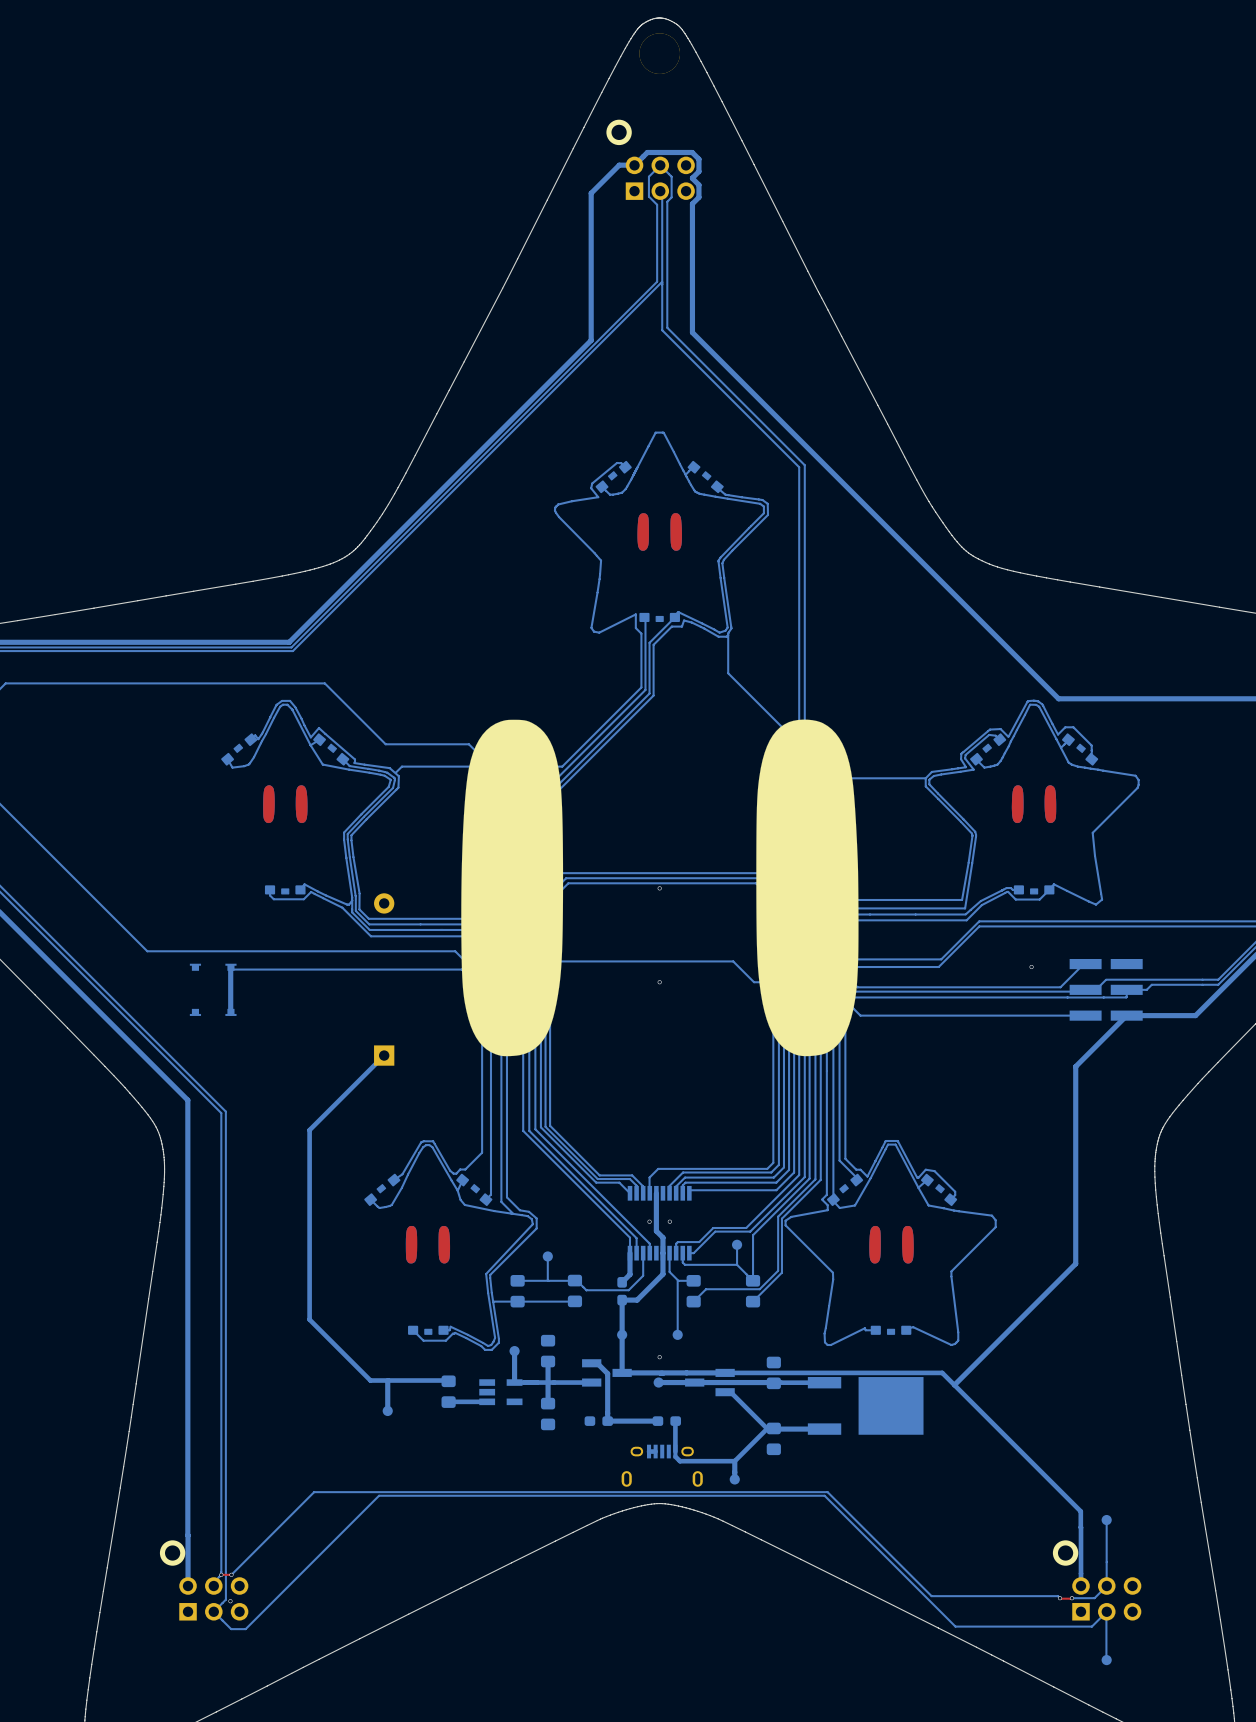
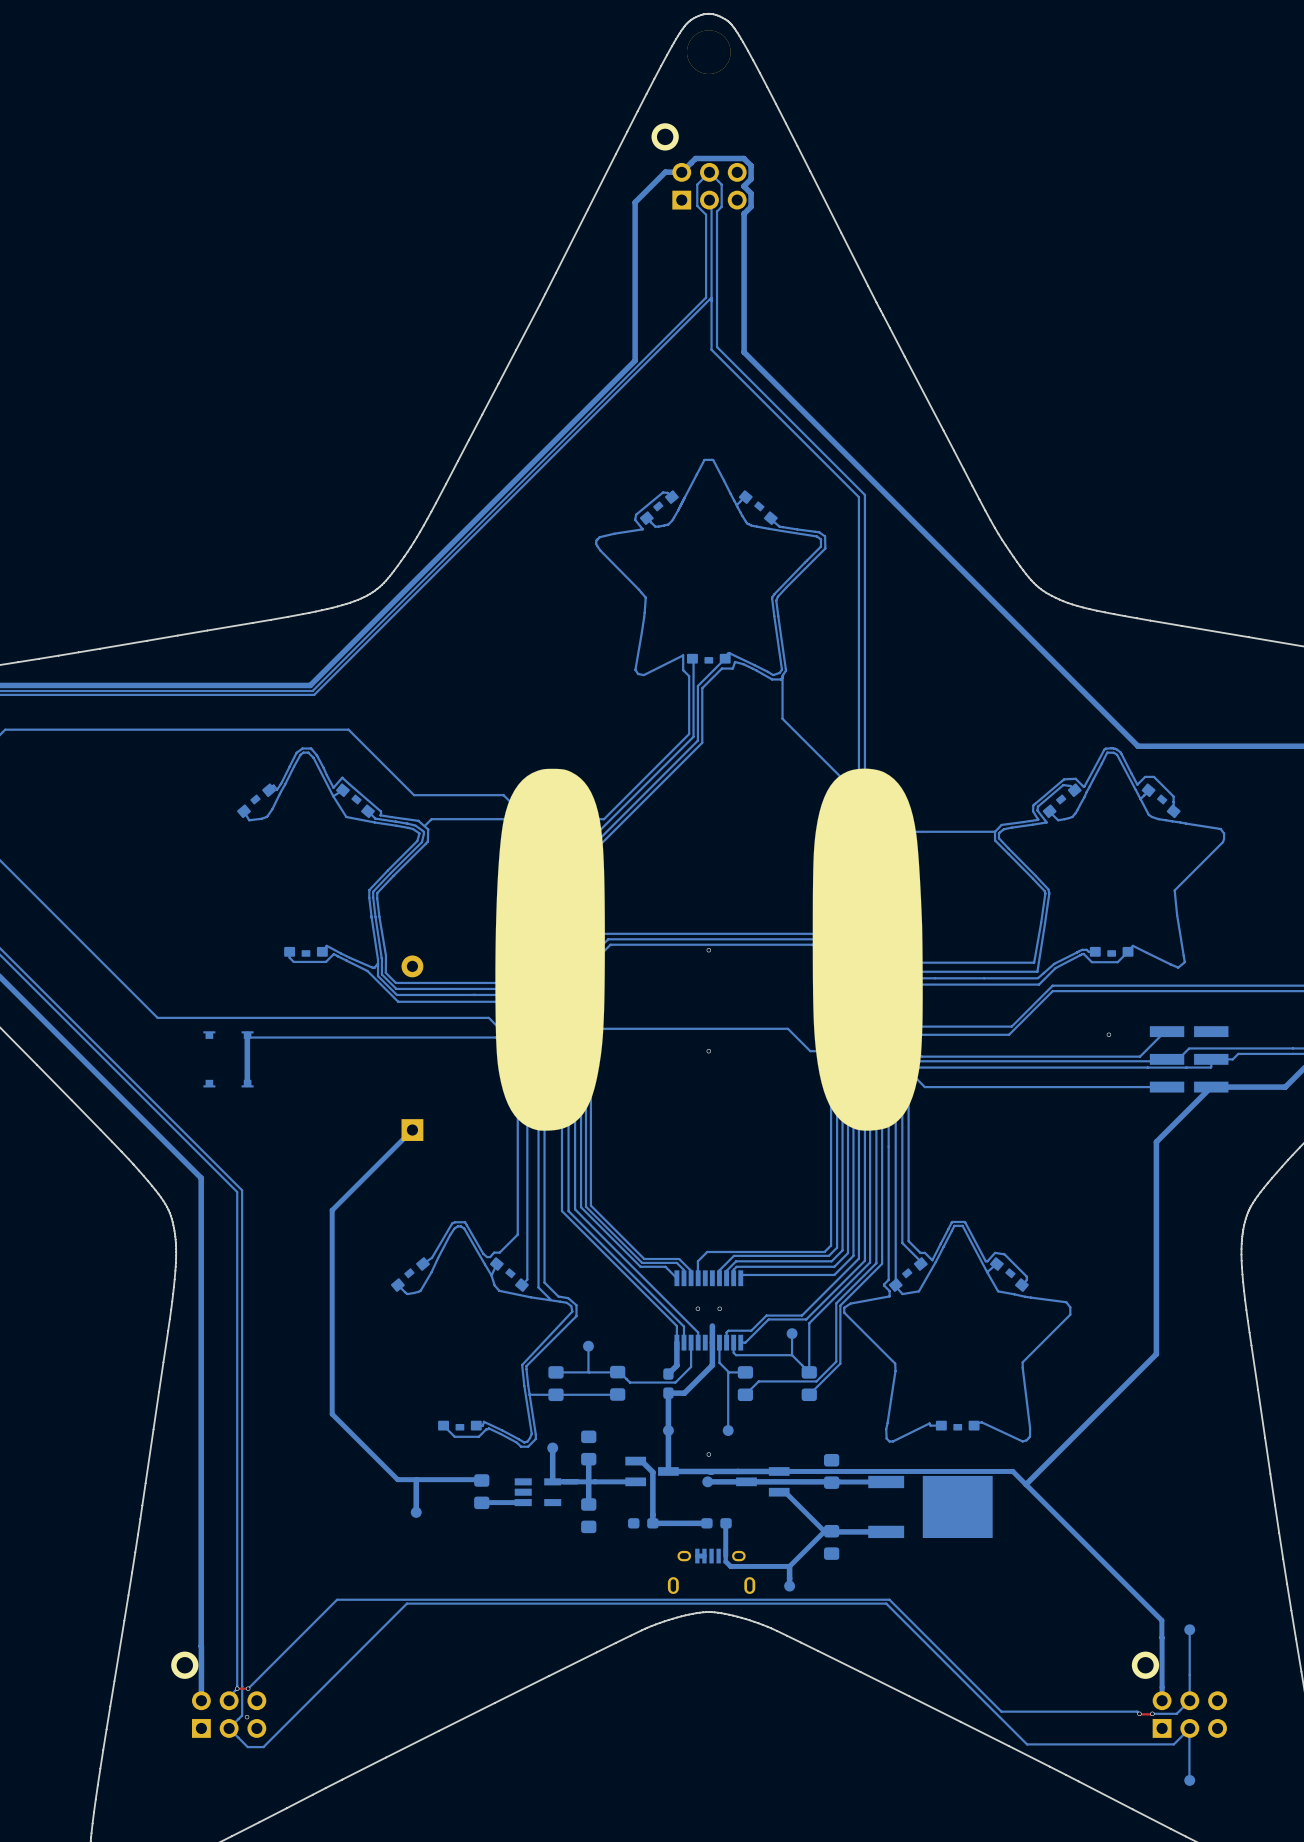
drawing: [263, 513, 1057, 1264] -> none
bottom track: (656, 1193) (656, 1231) (662, 1237) -> none

